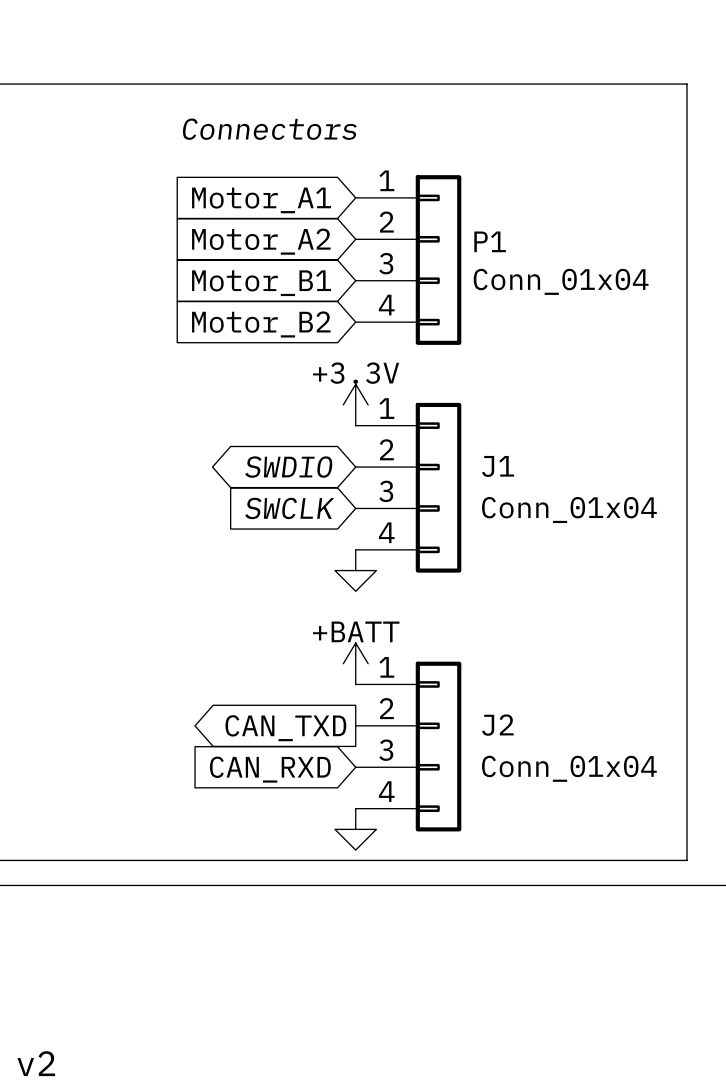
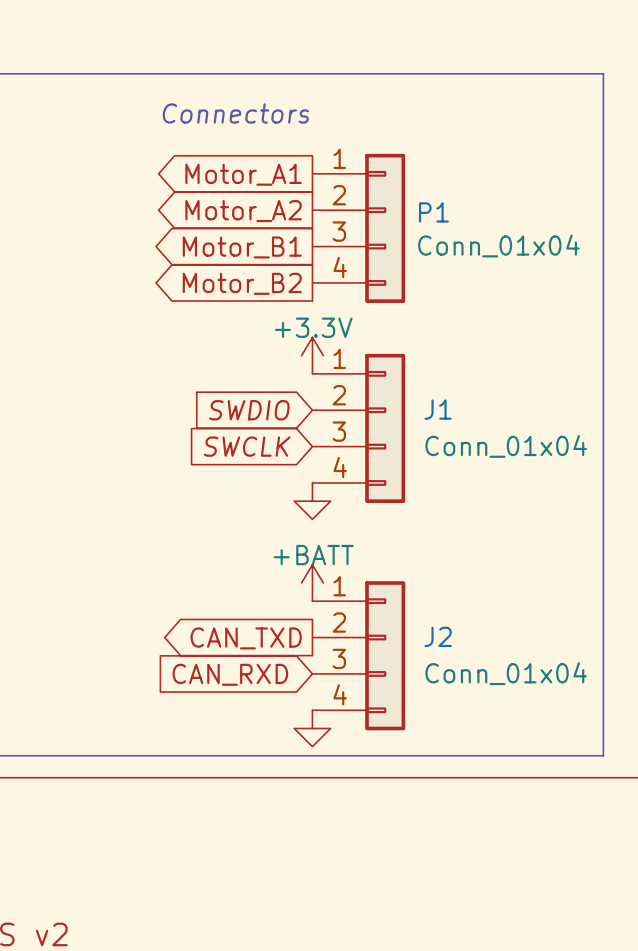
global label shape: input (261, 200) -> output (243, 174)
global label shape: input (261, 241) -> output (243, 211)
global label shape: input (261, 283) -> output (242, 247)
global label shape: input (261, 324) -> output (242, 283)
global label shape: bidirectional (288, 467) -> input (249, 410)

